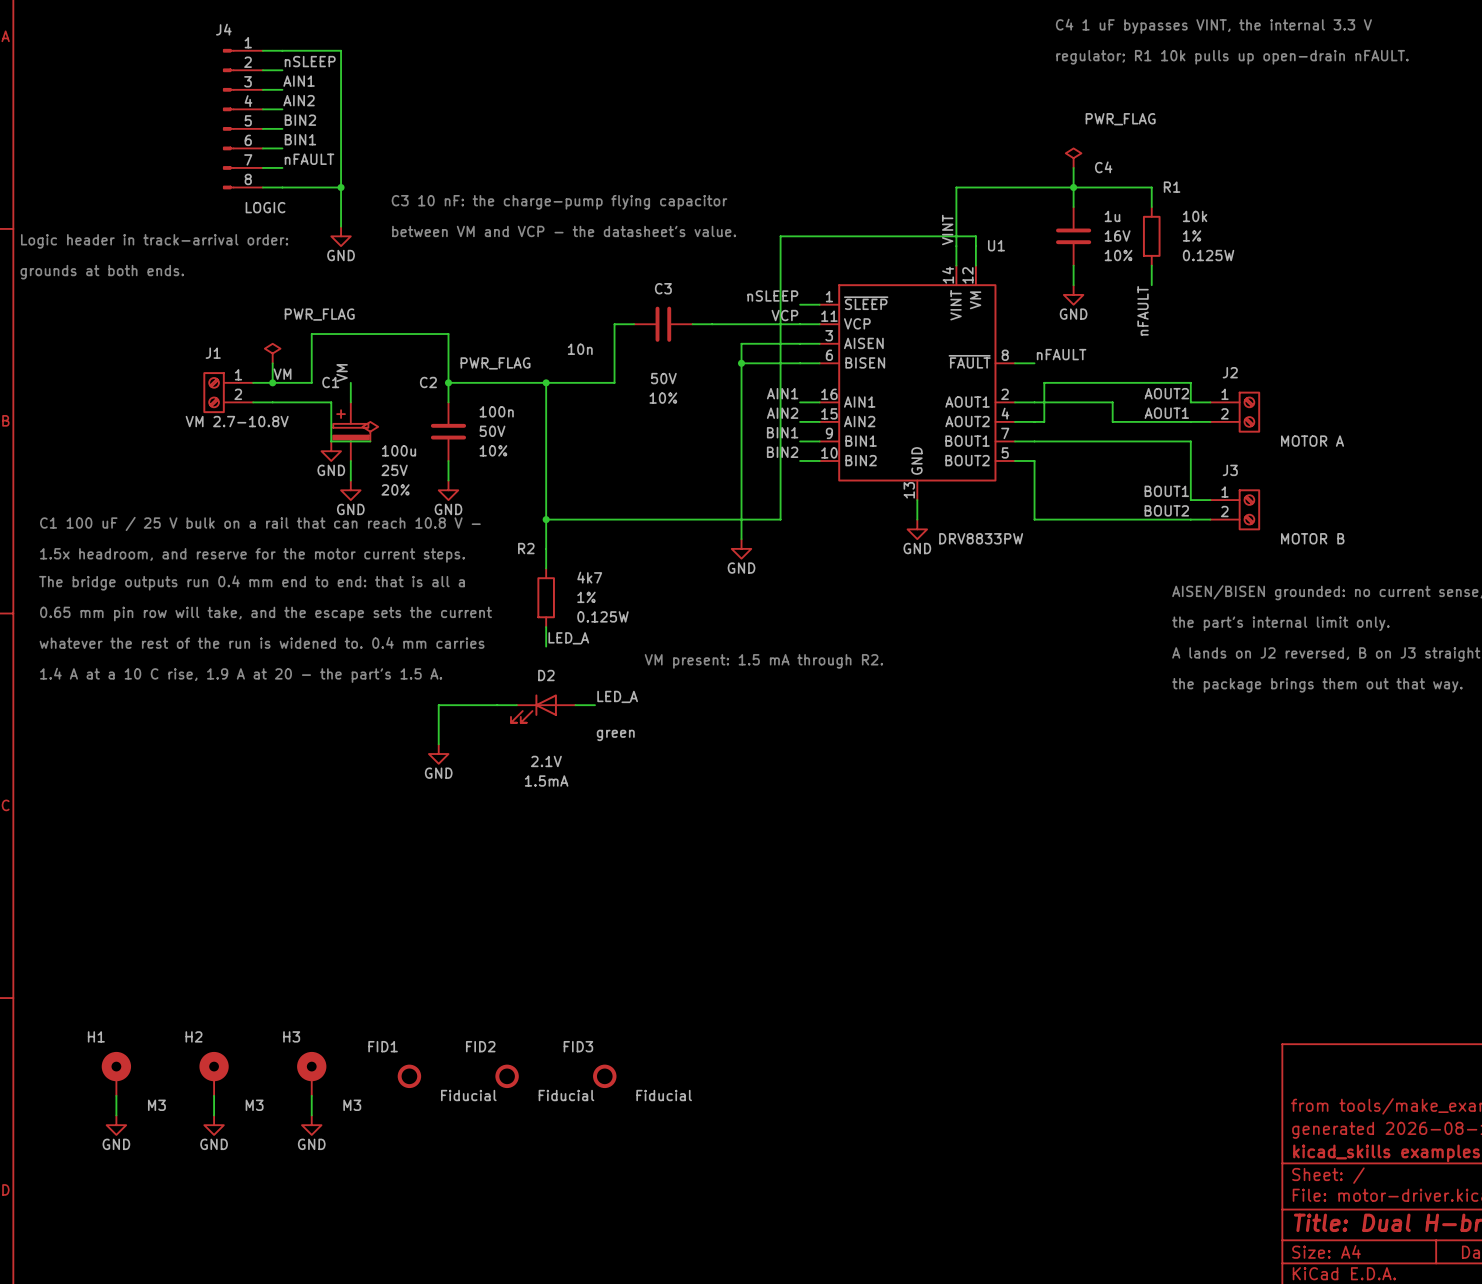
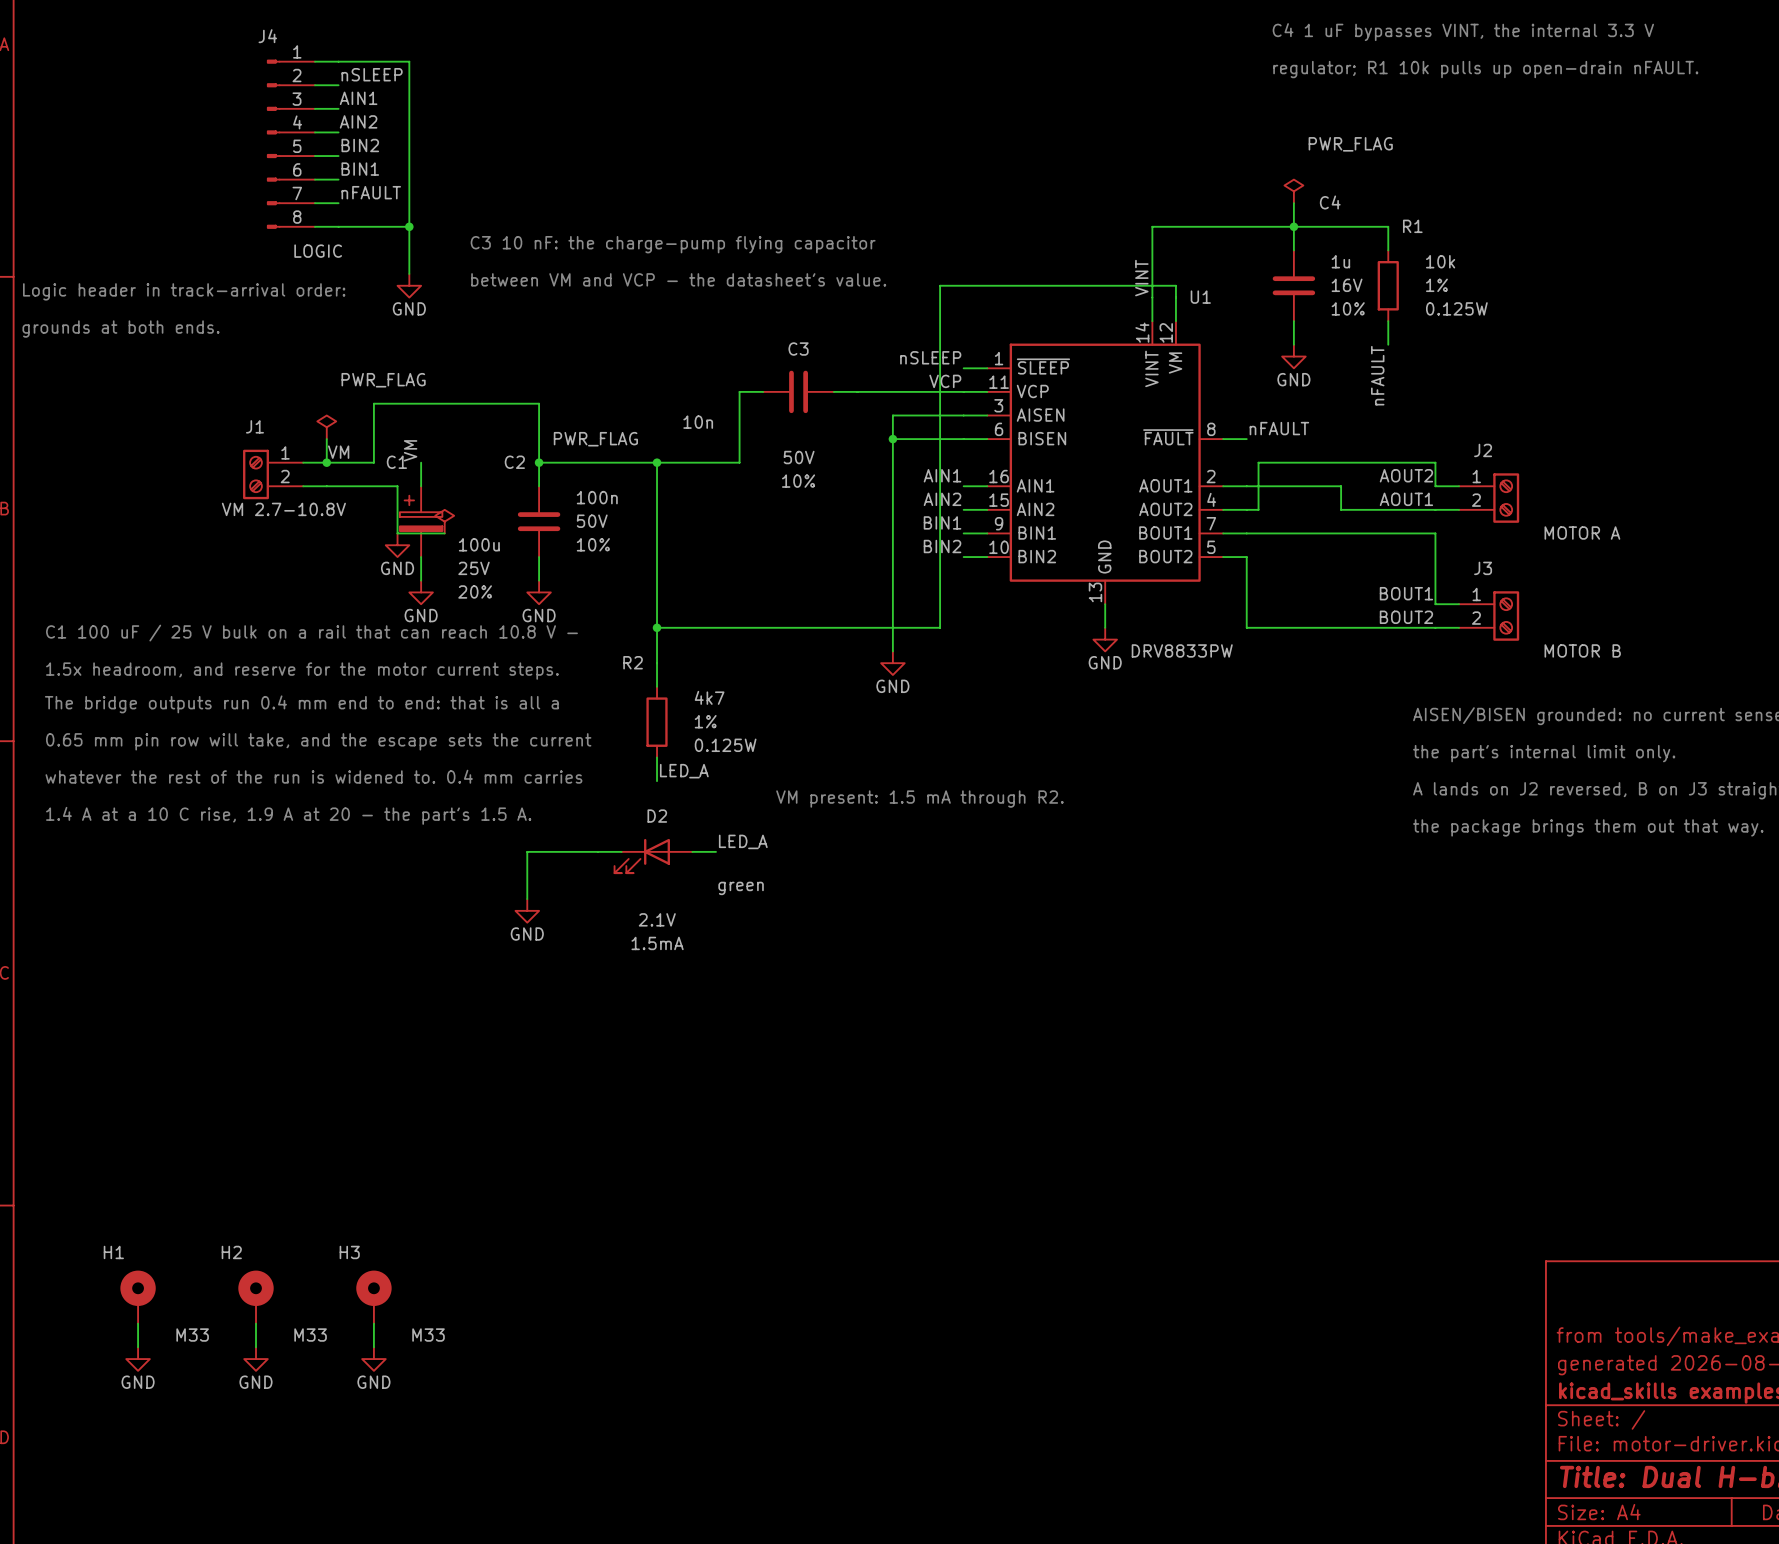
FID1: Fiducial (409, 1076) -> none
FID2: Fiducial (507, 1076) -> none
FID3: Fiducial (604, 1076) -> none
H1 value: M3 (156, 1105) -> M33 (192, 1335)
H2 value: M3 (254, 1105) -> M33 (310, 1335)
H3 value: M3 (352, 1105) -> M33 (428, 1335)

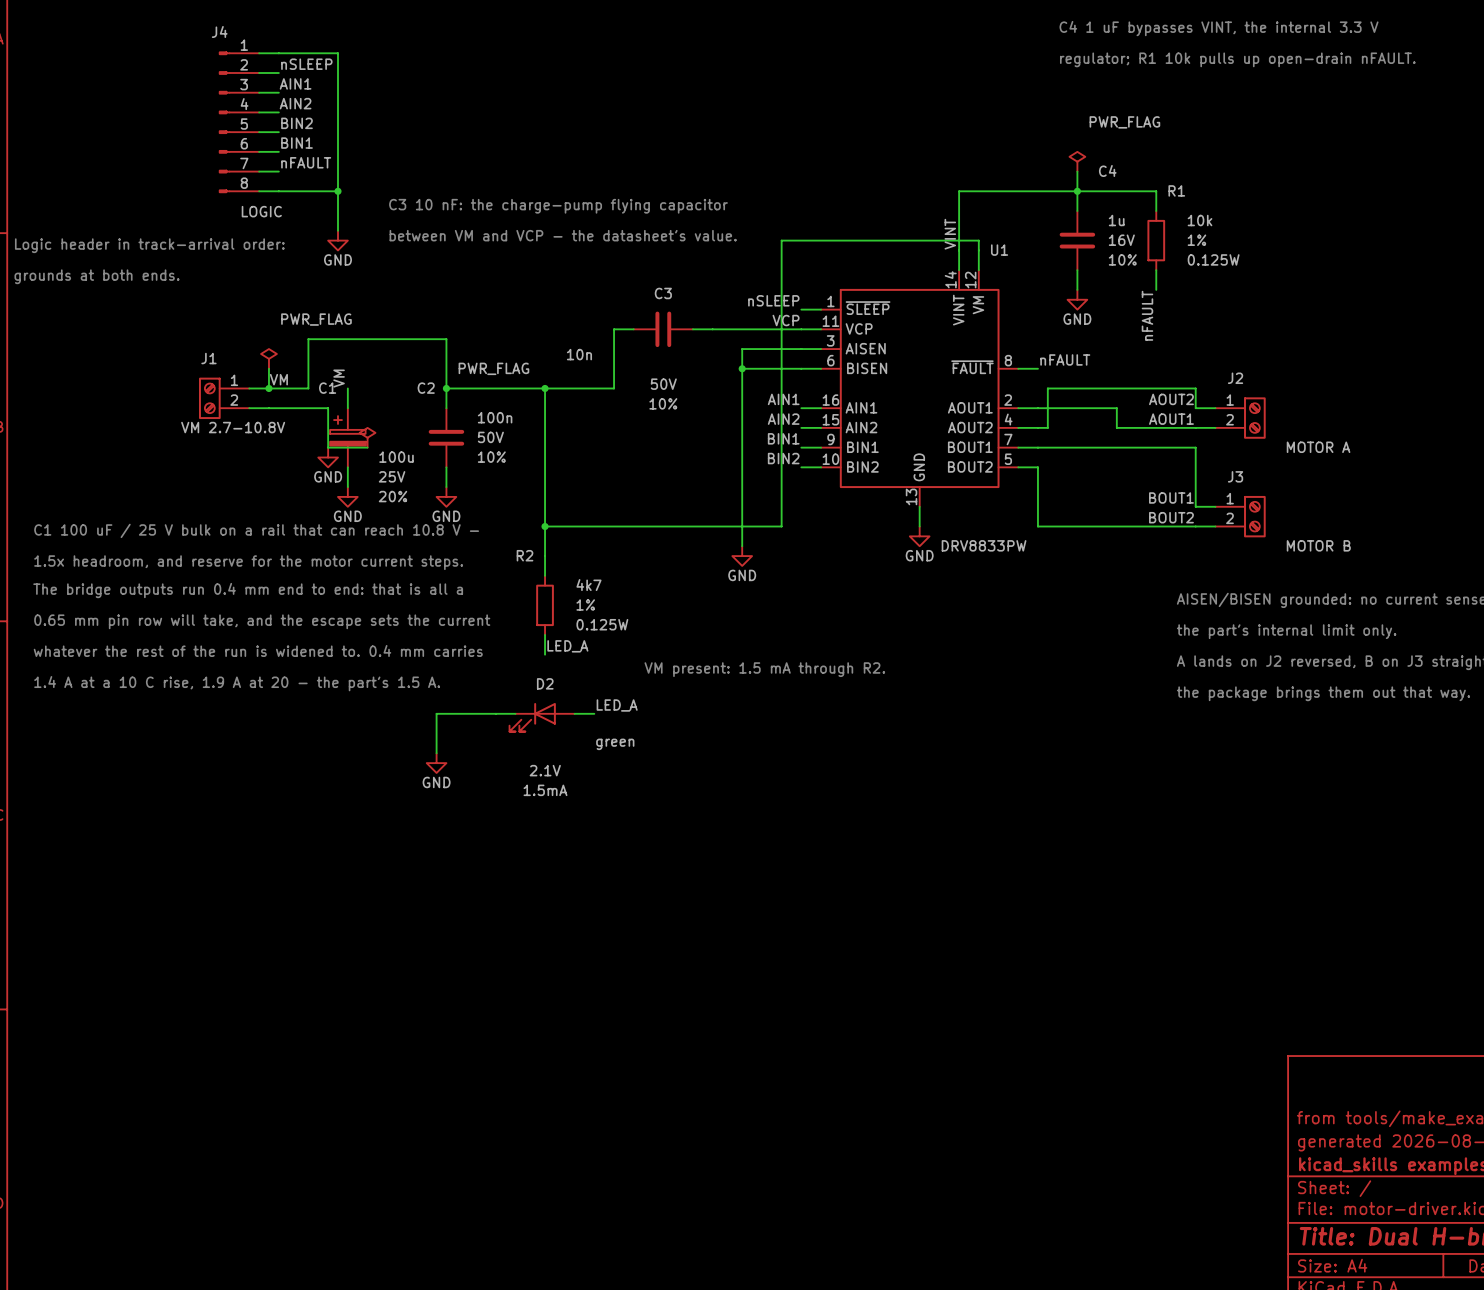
H1: M33 (138, 1297) -> none
H2: M33 (256, 1297) -> none
H3: M33 (373, 1297) -> none
wire: (138, 1323) (138, 1347) -> none
wire: (256, 1323) (256, 1347) -> none
wire: (373, 1323) (373, 1347) -> none
power symbol: GND (138, 1359) -> none
power symbol: GND (256, 1359) -> none
power symbol: GND (373, 1359) -> none

